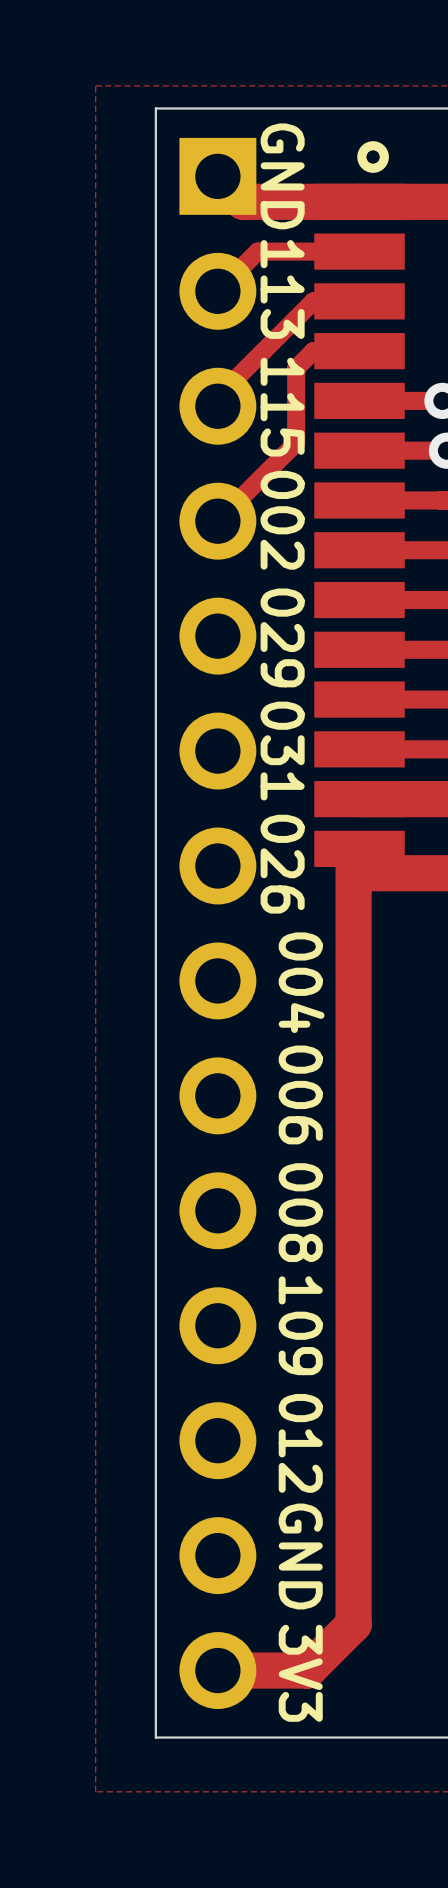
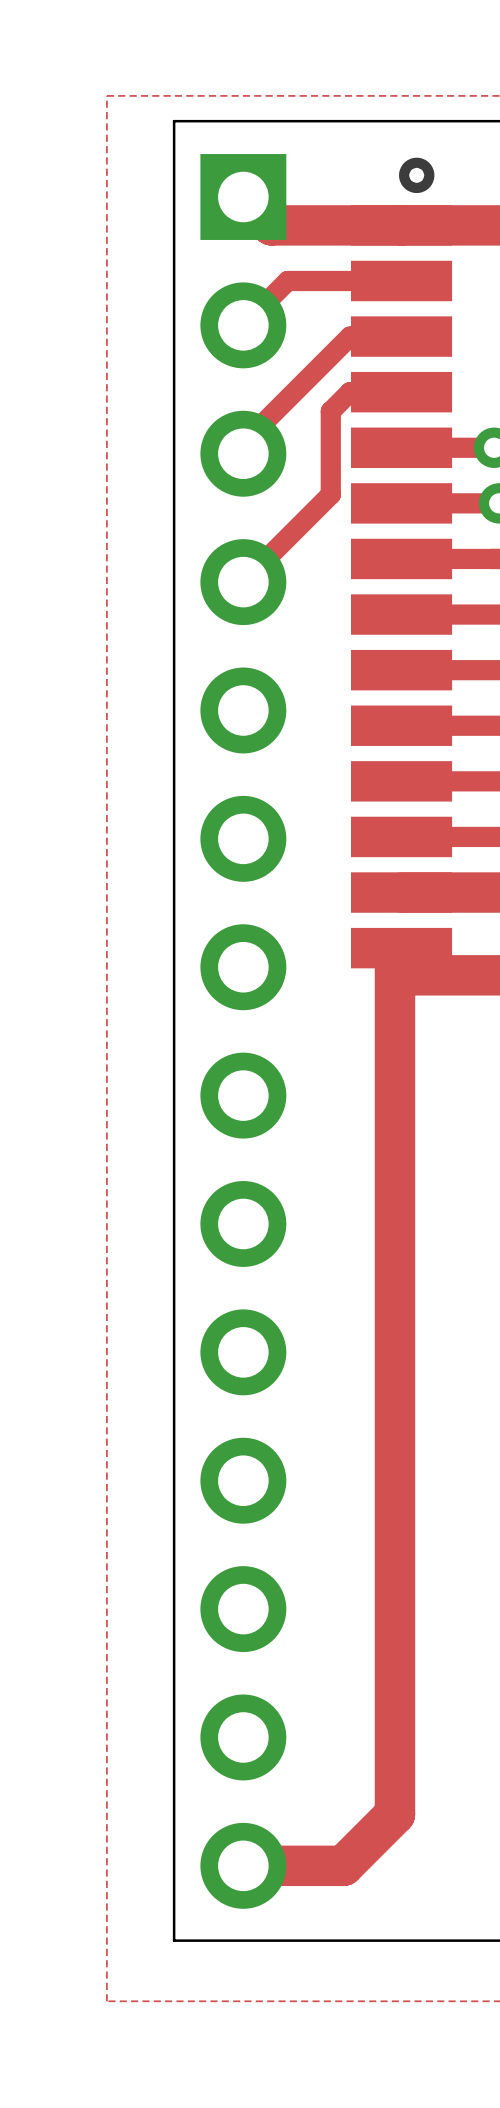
text: GND (282, 176) -> none
text: 113 (282, 289) -> none
text: 115 (282, 407) -> none
text: 002 (282, 520) -> none
text: 029 (282, 637) -> none
text: 031 (282, 751) -> none
text: 026 (282, 864) -> none
text: 004 (301, 982) -> none
text: 006 (300, 1094) -> none
text: 008 (300, 1212) -> none
text: 109 (300, 1325) -> none
text: 012 (300, 1443) -> none
text: GND (300, 1556) -> none
text: 3V3 (300, 1673) -> none

